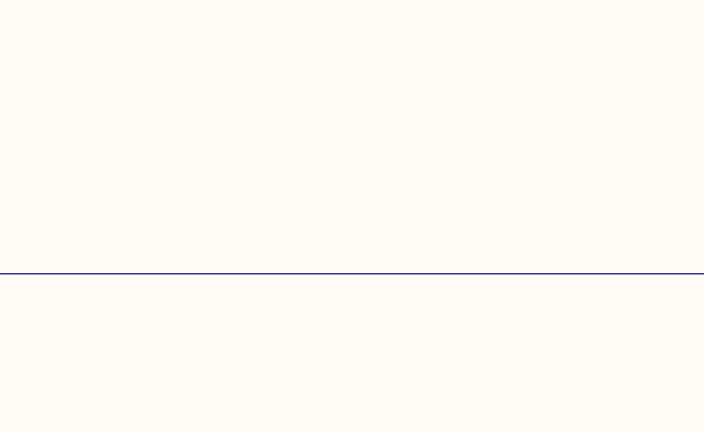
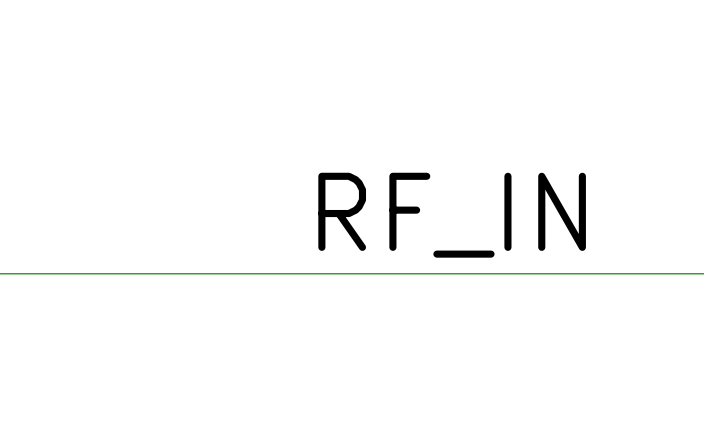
label: none -> RF_IN (452, 215)

